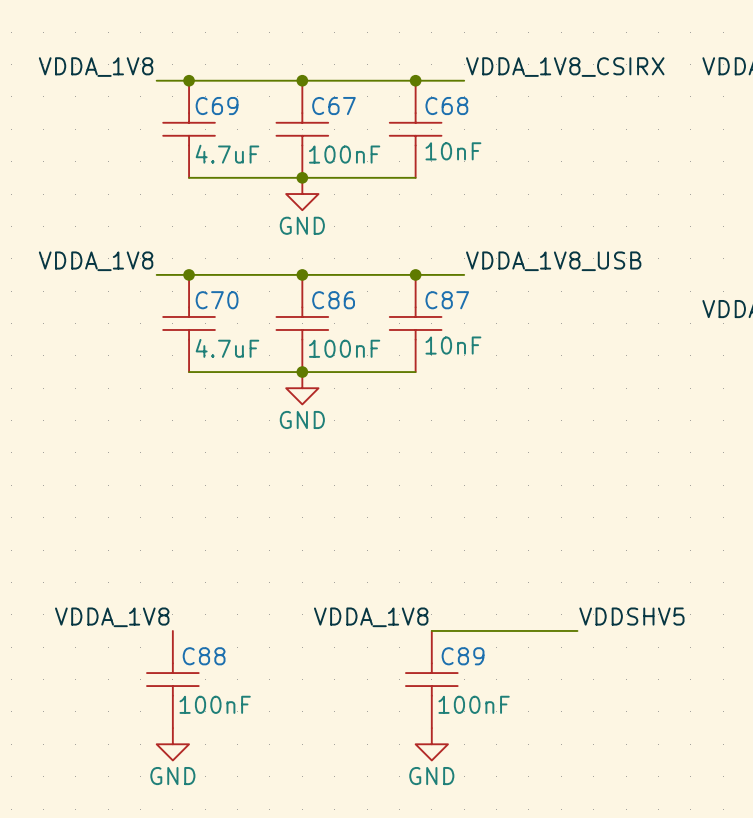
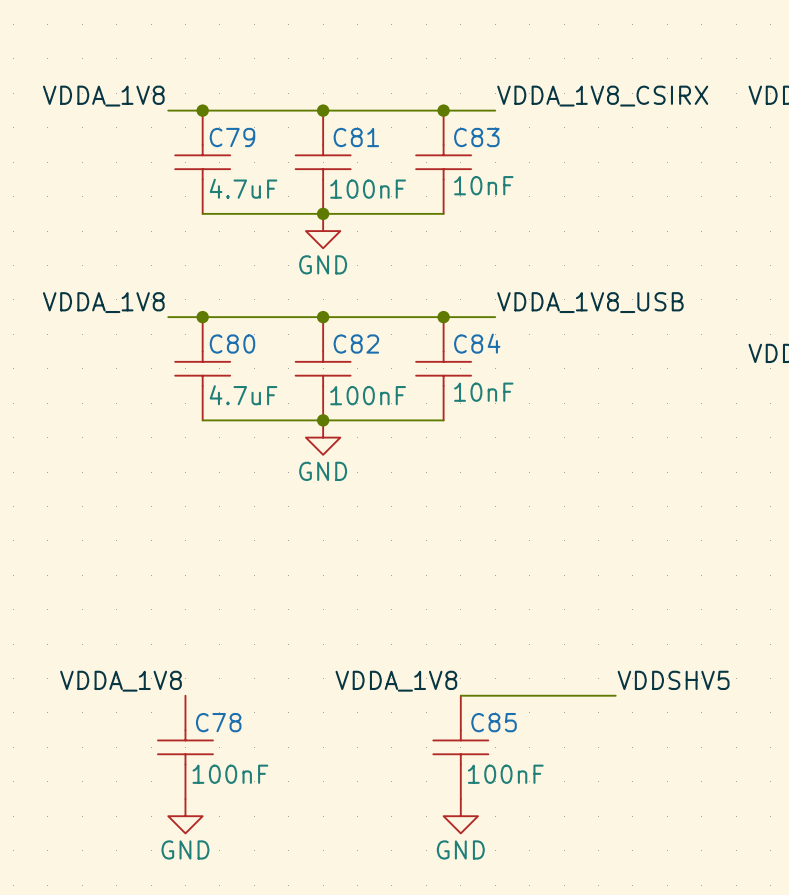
C69 name: C69 (217, 106) -> C79 (232, 137)
C67 name: C67 (333, 106) -> C81 (356, 137)
C68 name: C68 (446, 106) -> C83 (476, 137)
C70 name: C70 (217, 300) -> C80 (232, 344)
C86 name: C86 (333, 300) -> C82 (356, 344)
C87 name: C87 (447, 300) -> C84 (477, 343)
C88 name: C88 (204, 656) -> C78 (218, 722)
C89 name: C89 (463, 656) -> C85 (494, 722)

